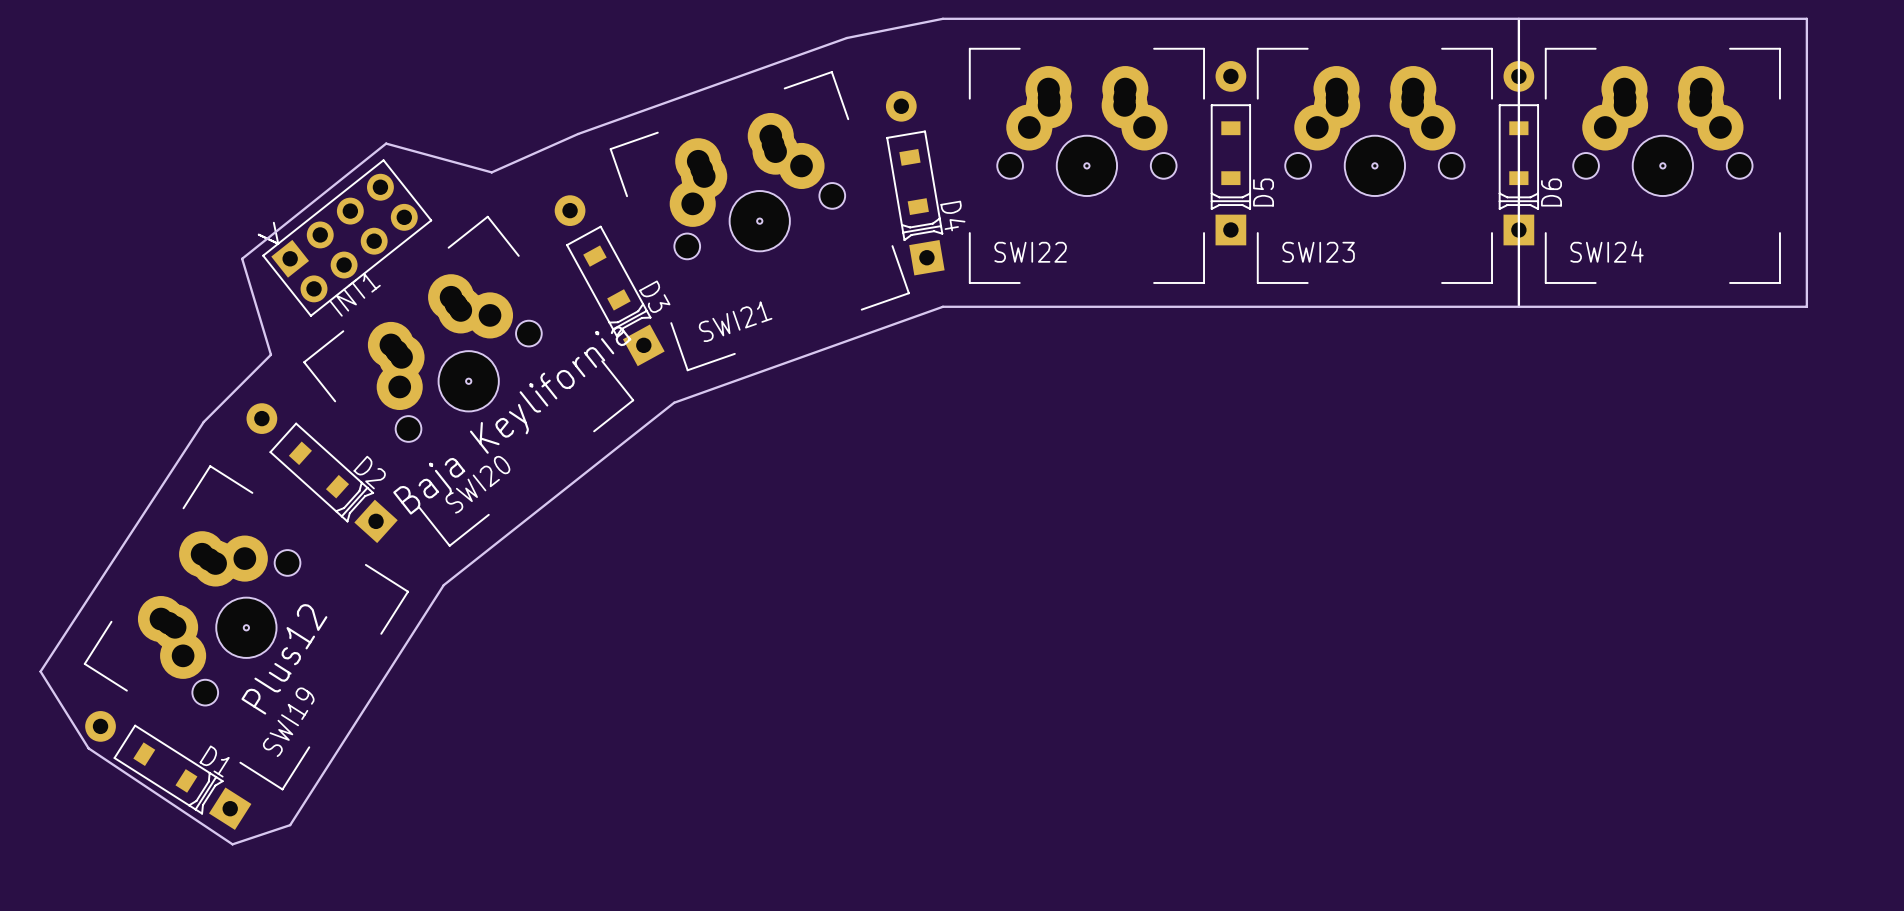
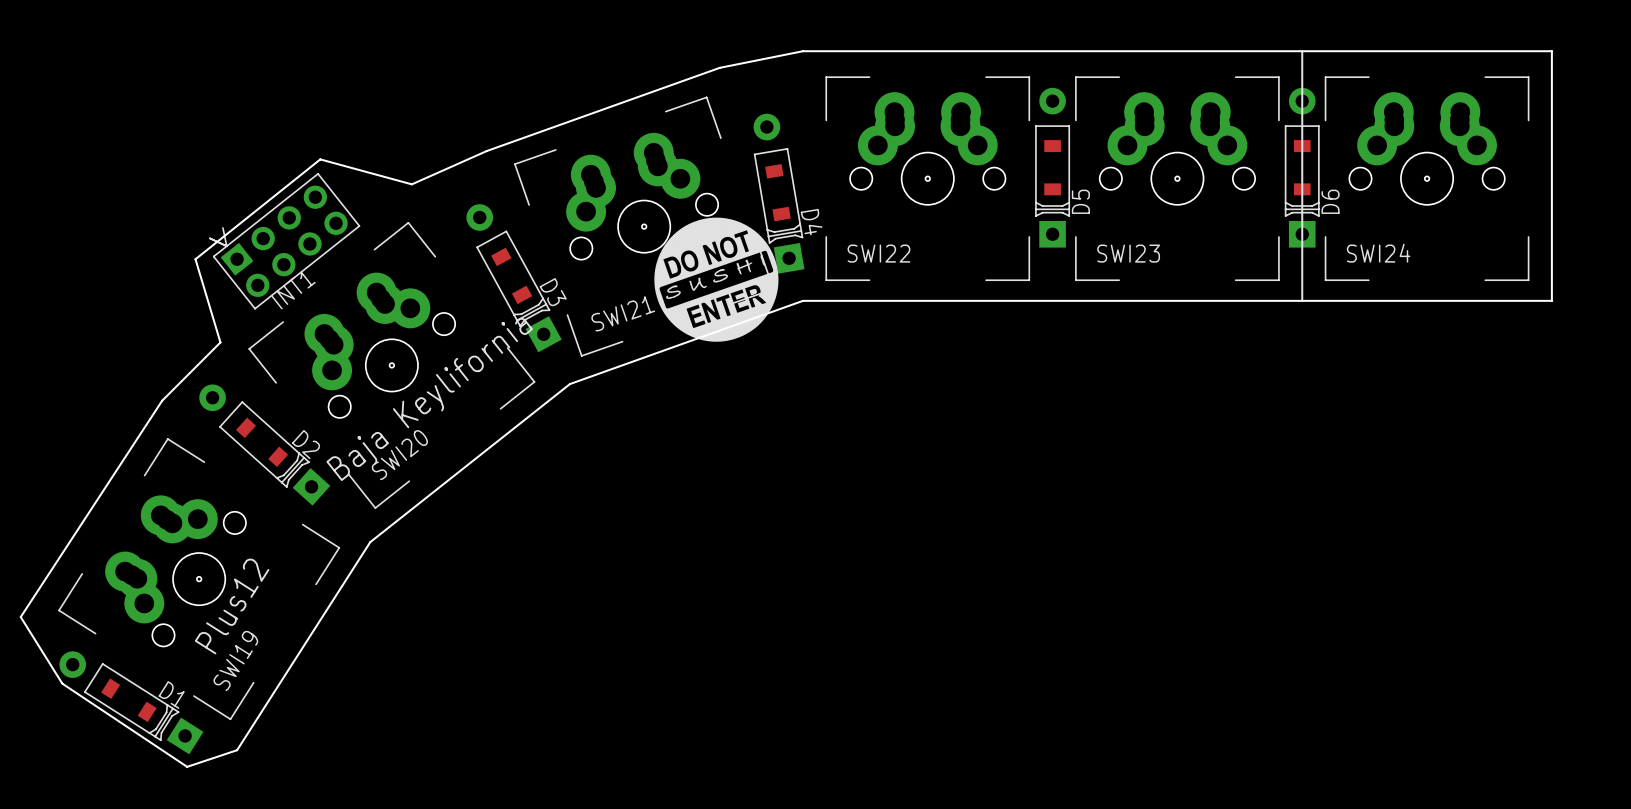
drawing: none -> [654, 217, 779, 342]

